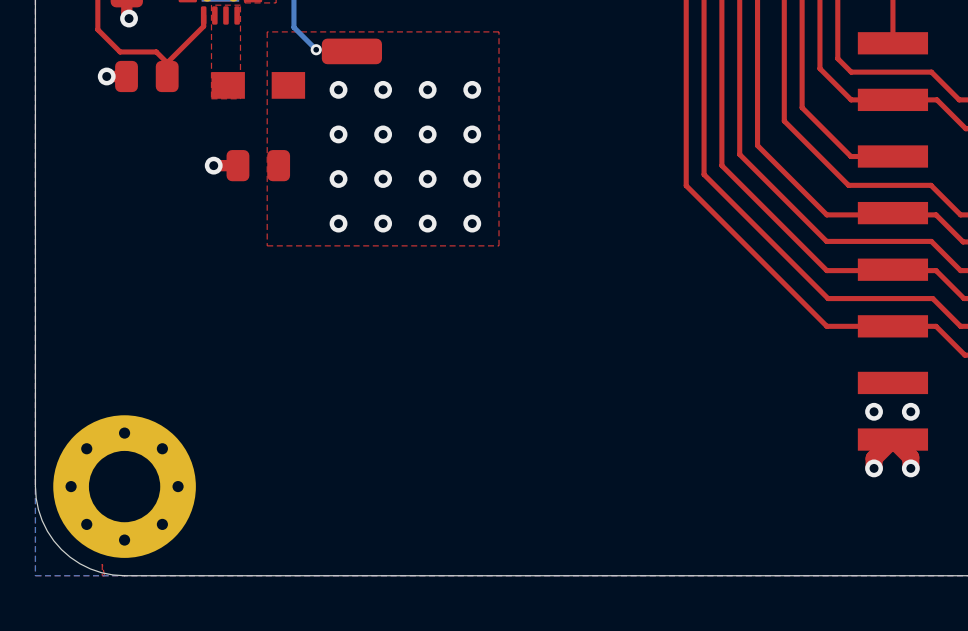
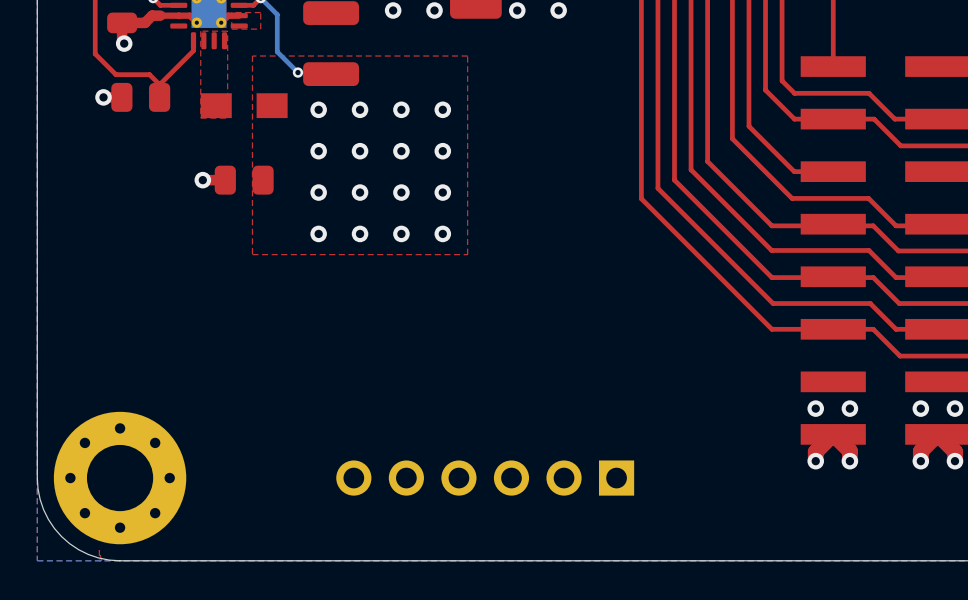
part: none -> (485, 478)

